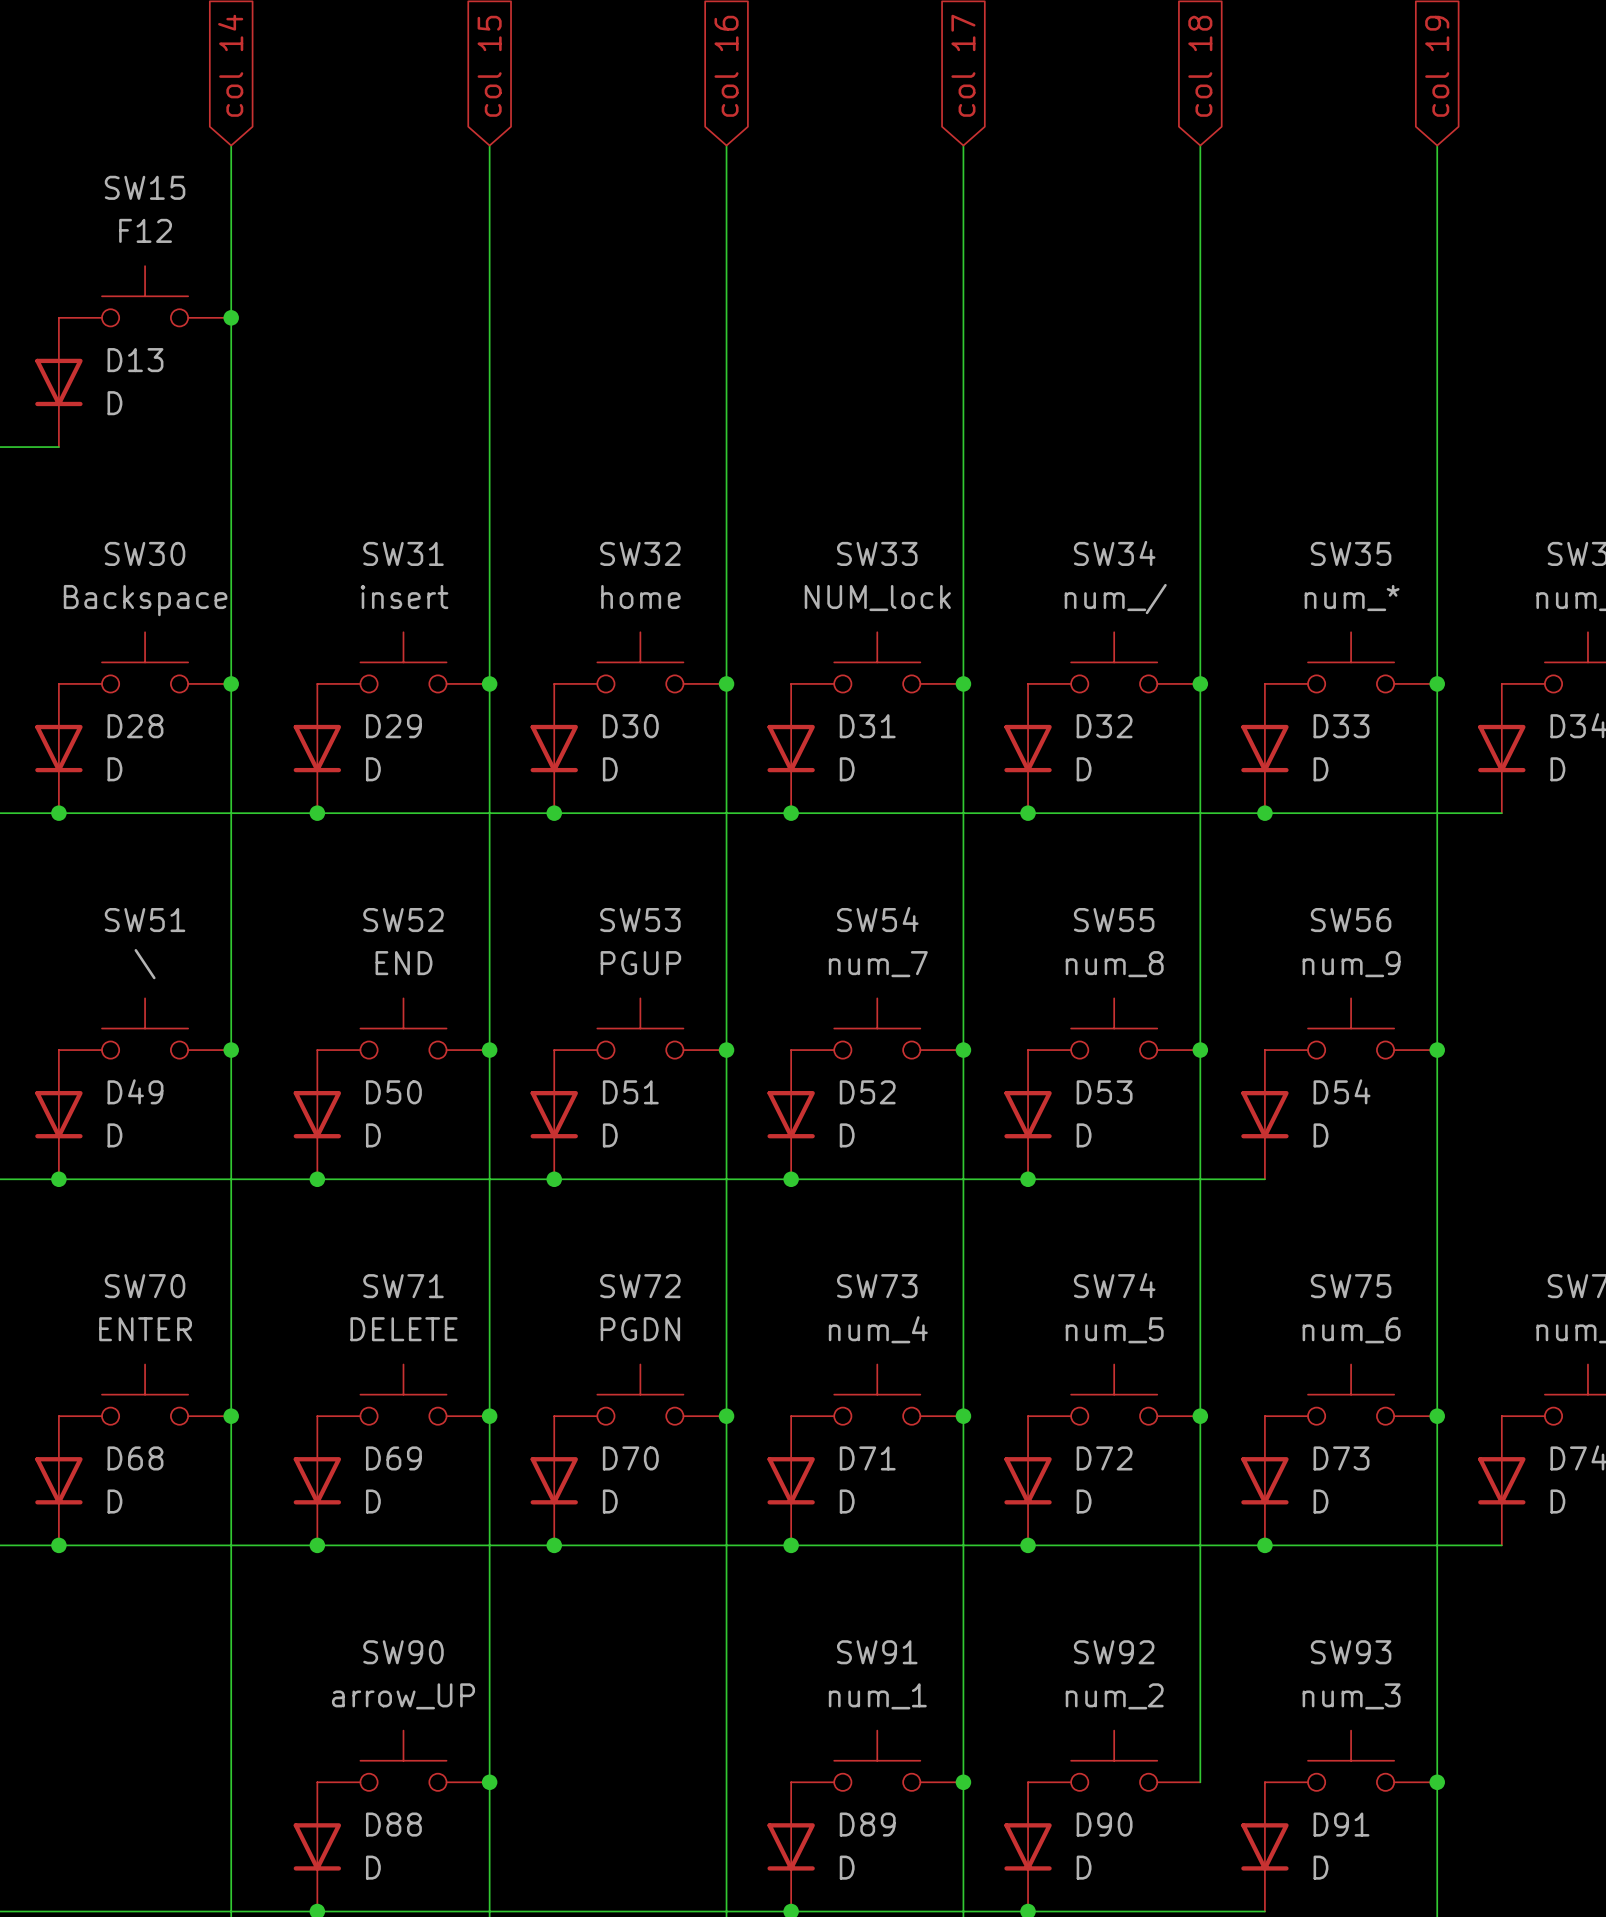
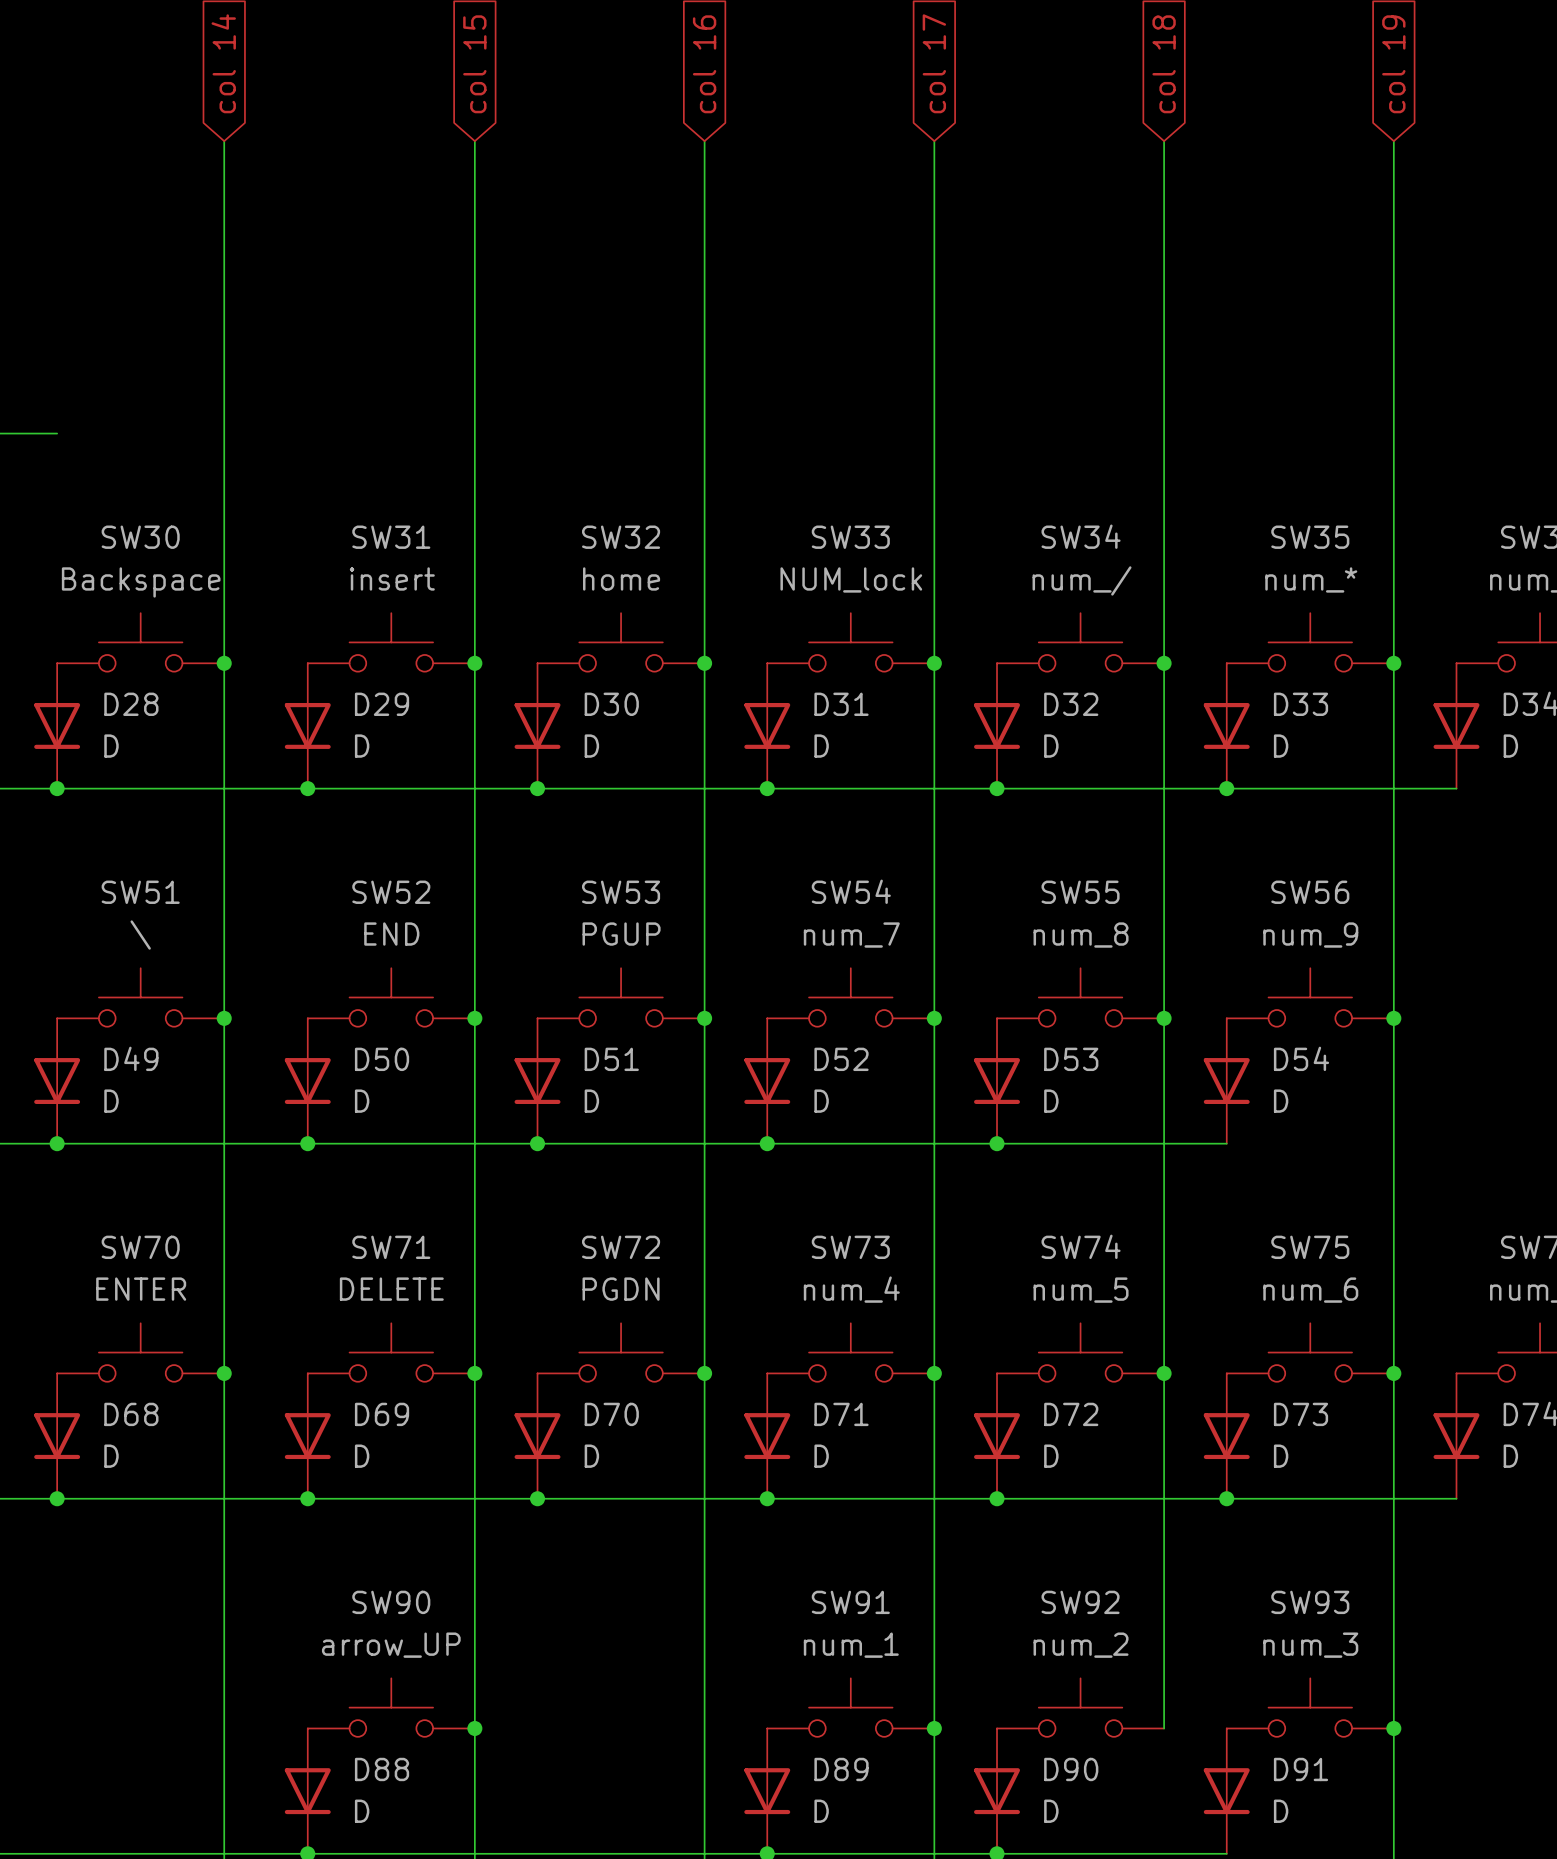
SW15: F12 (145, 296) -> none
junction: (231, 317) -> none
D13: D (58, 382) -> none

